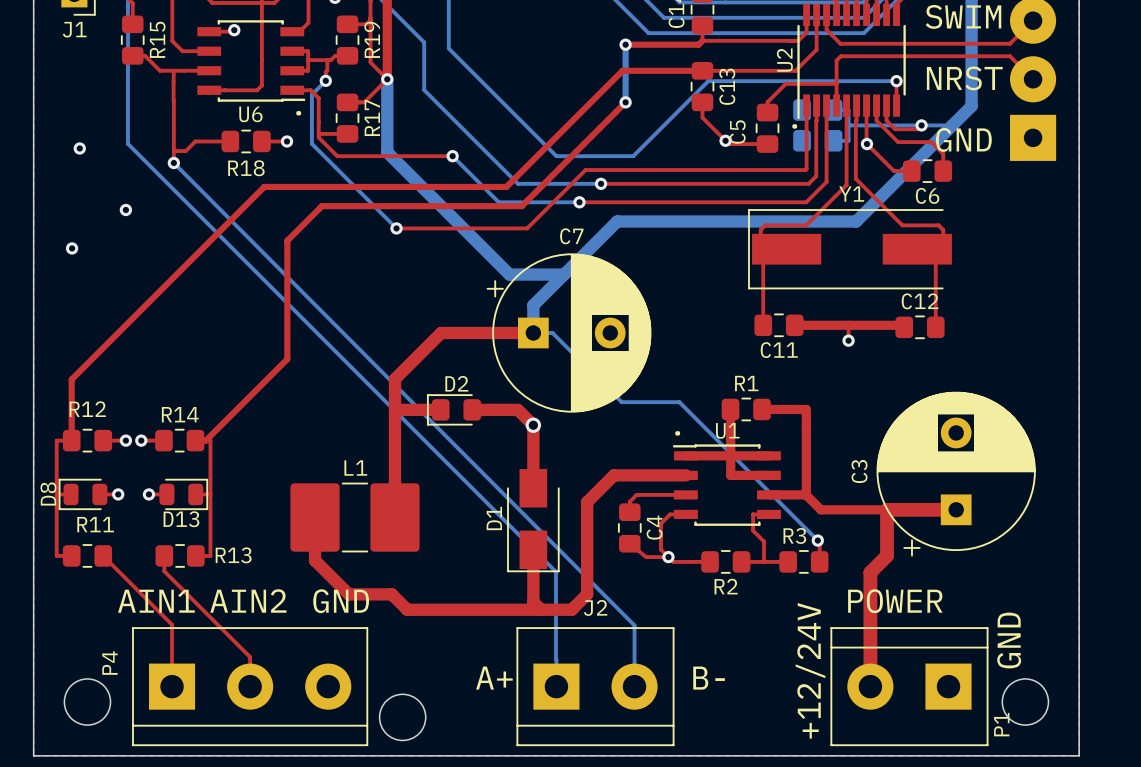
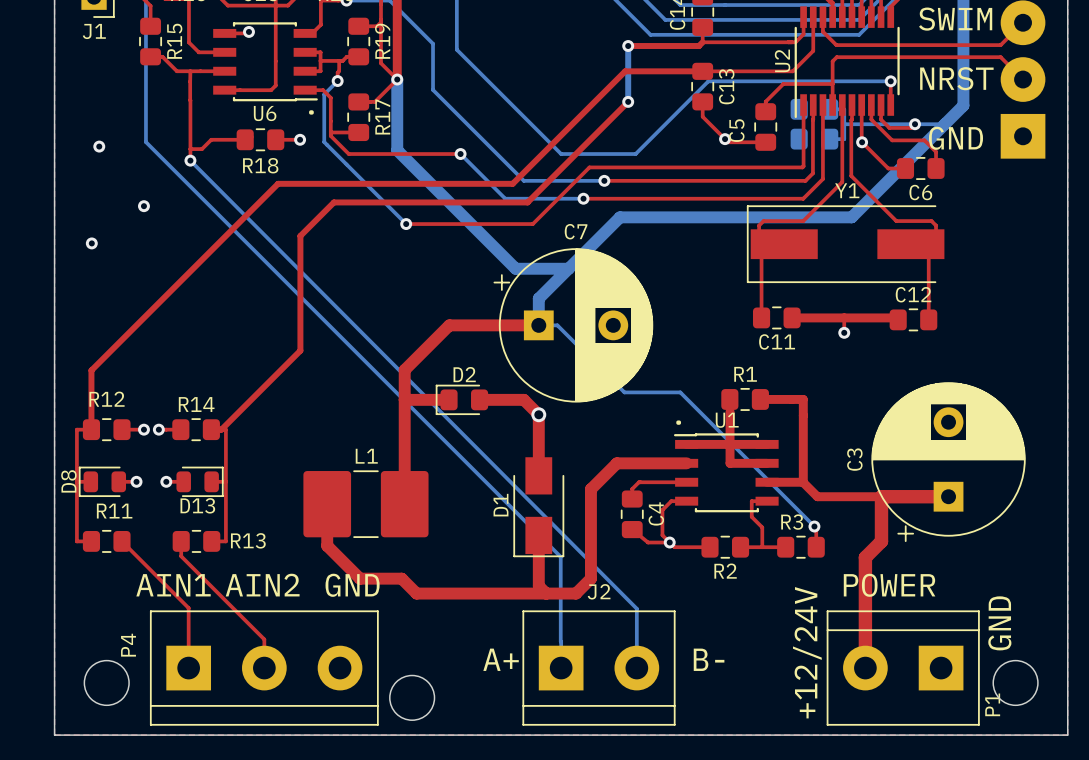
text: . (794, 126) -> none

